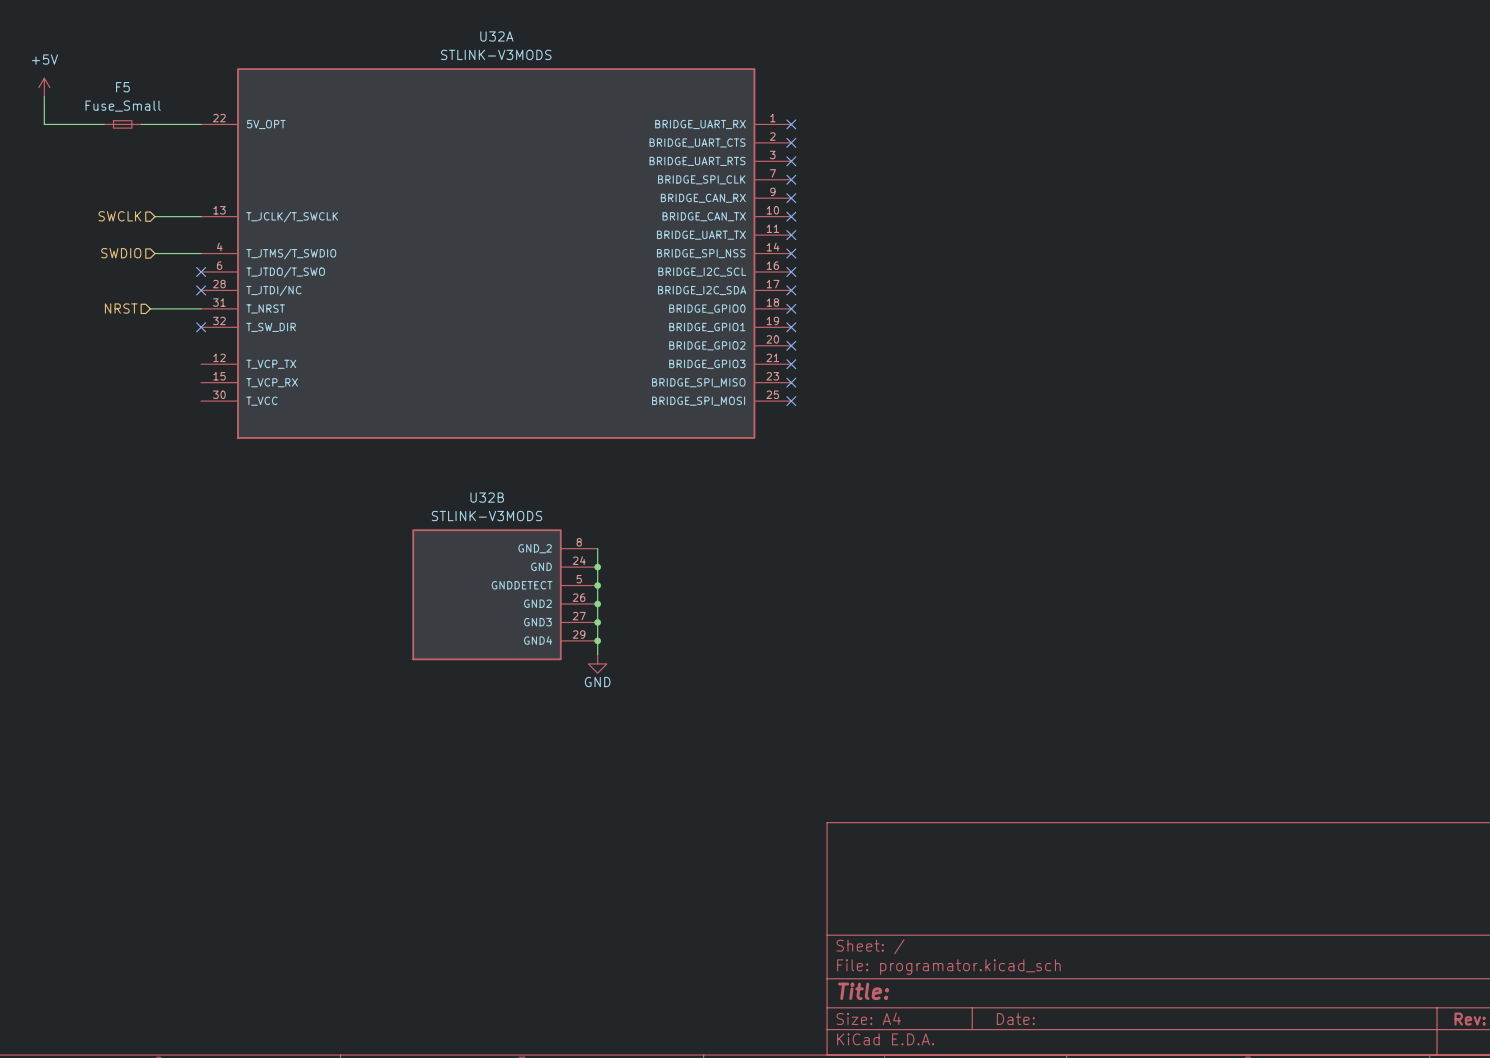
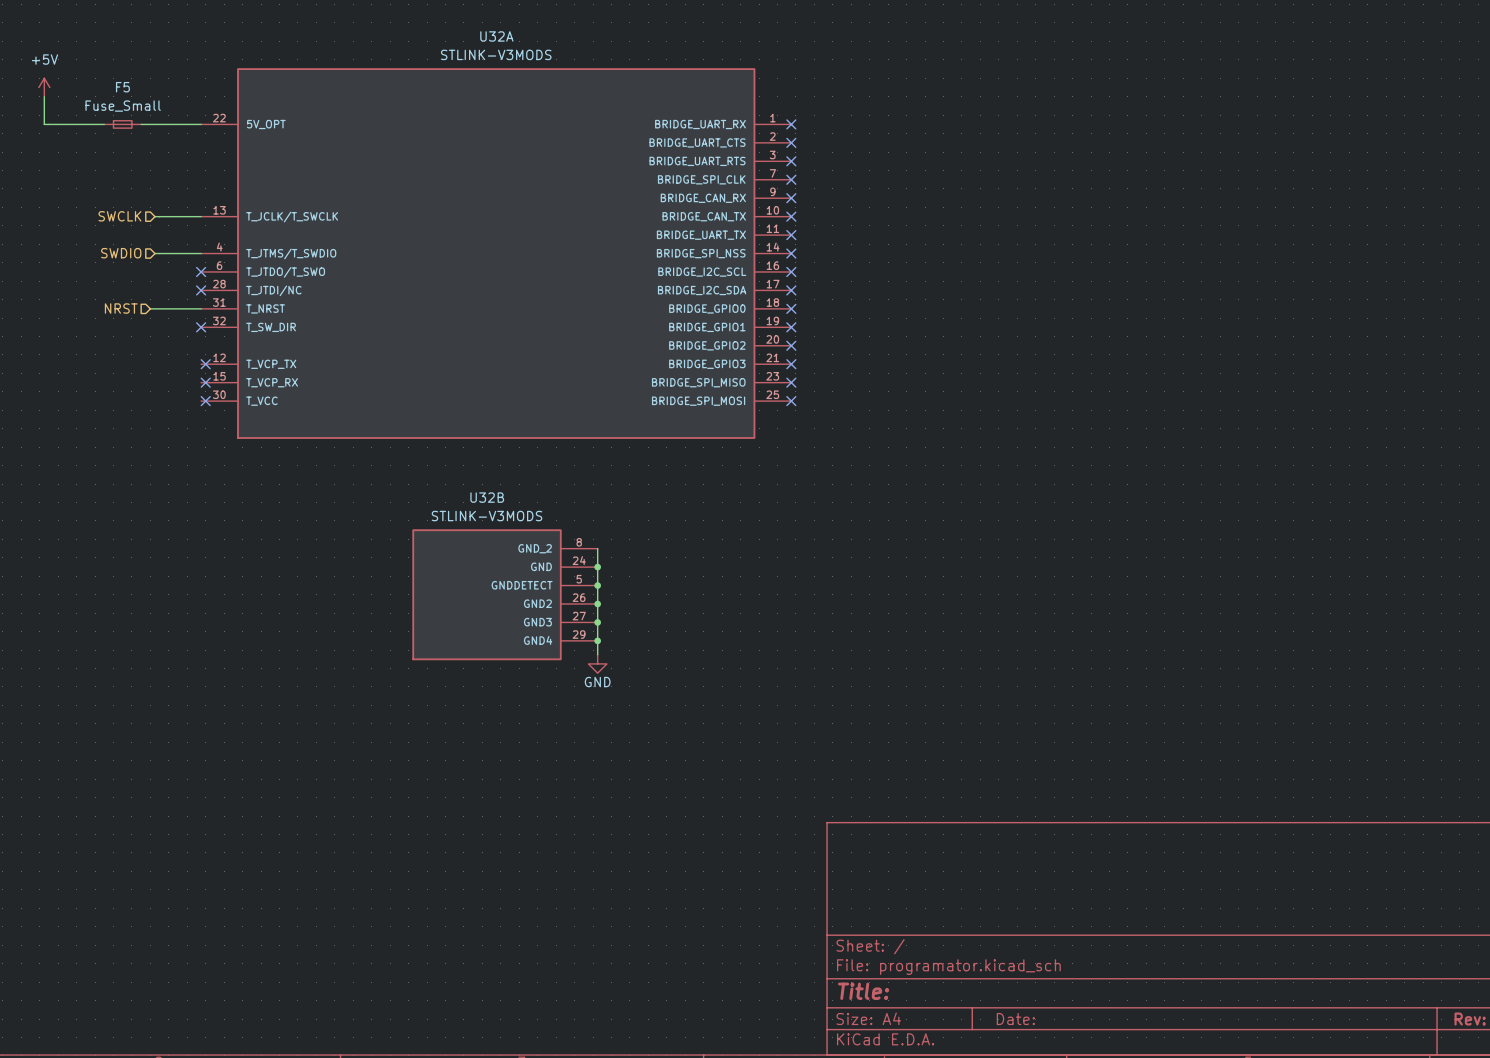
no-connect mark: none -> (205, 364)
no-connect mark: none -> (205, 382)
no-connect mark: none -> (205, 401)

